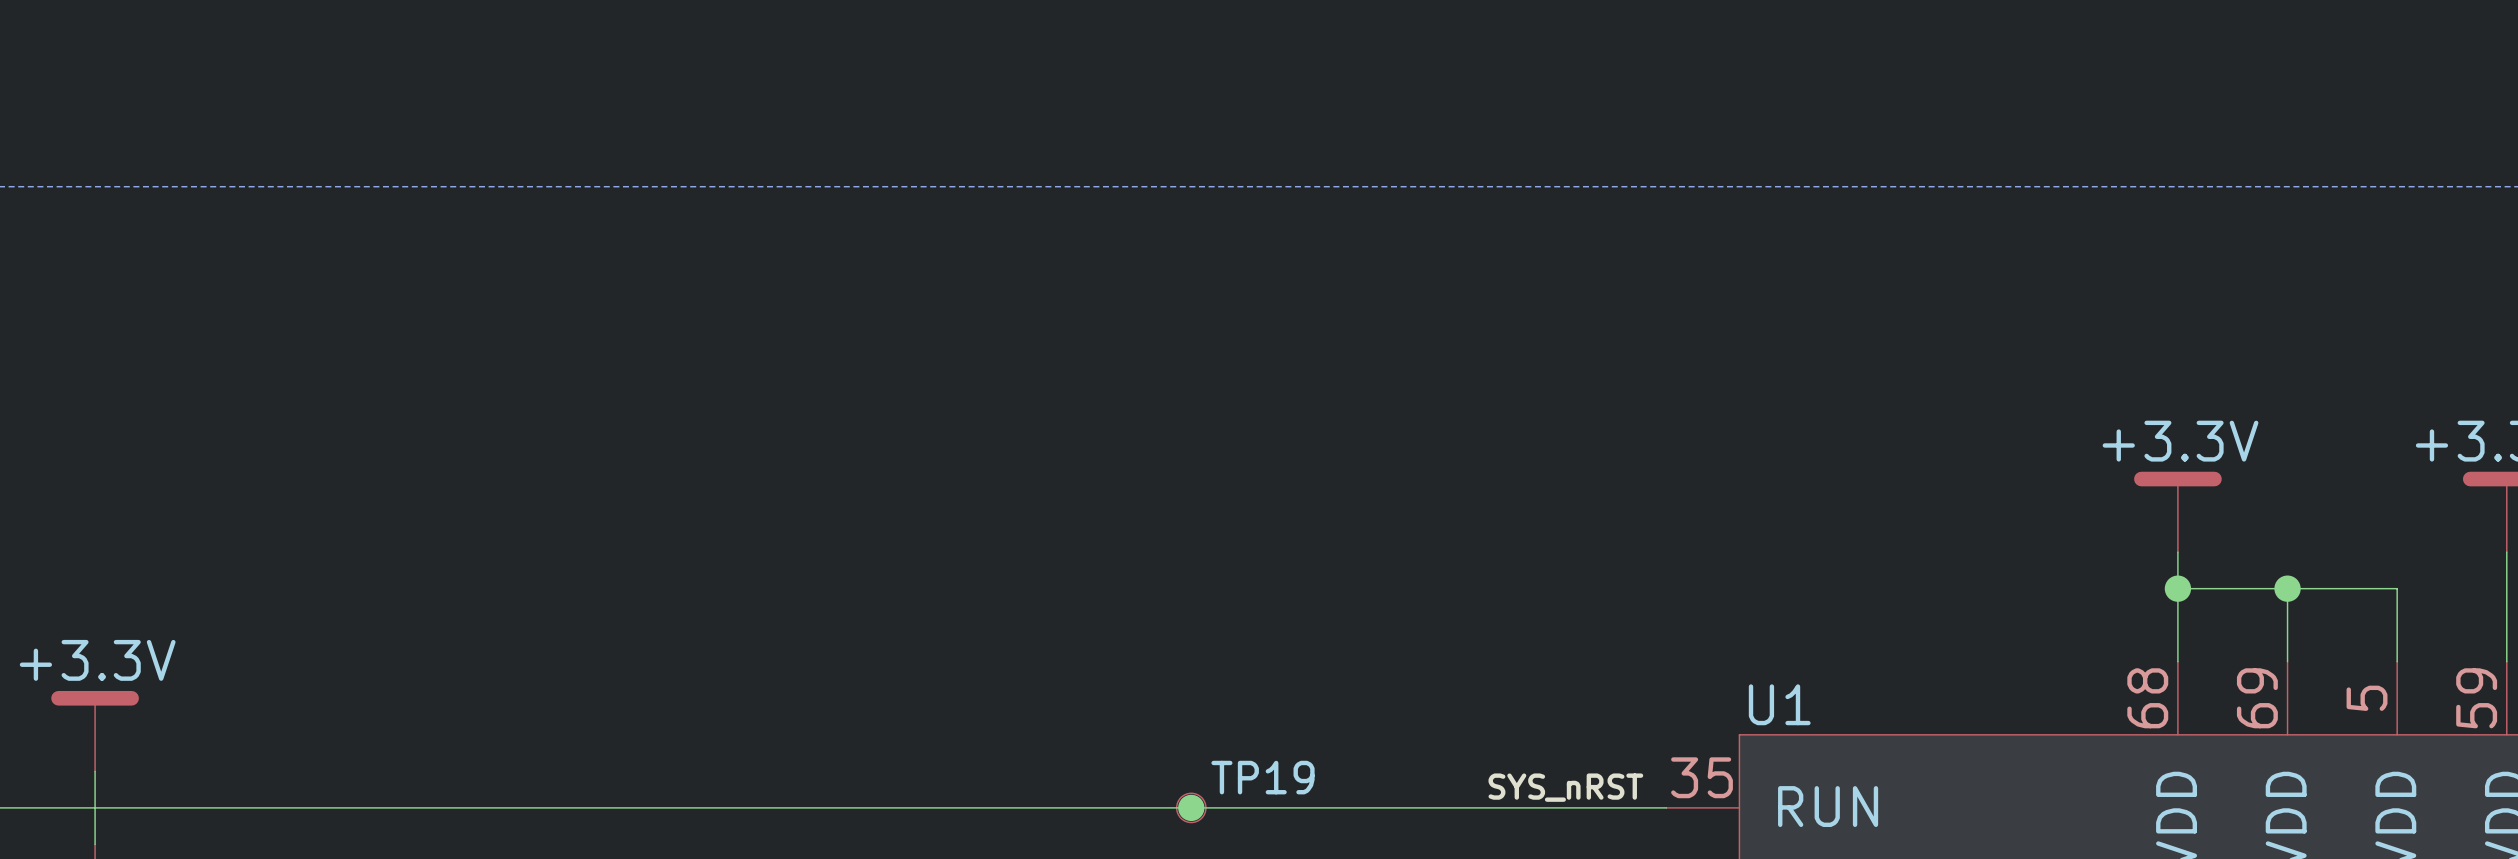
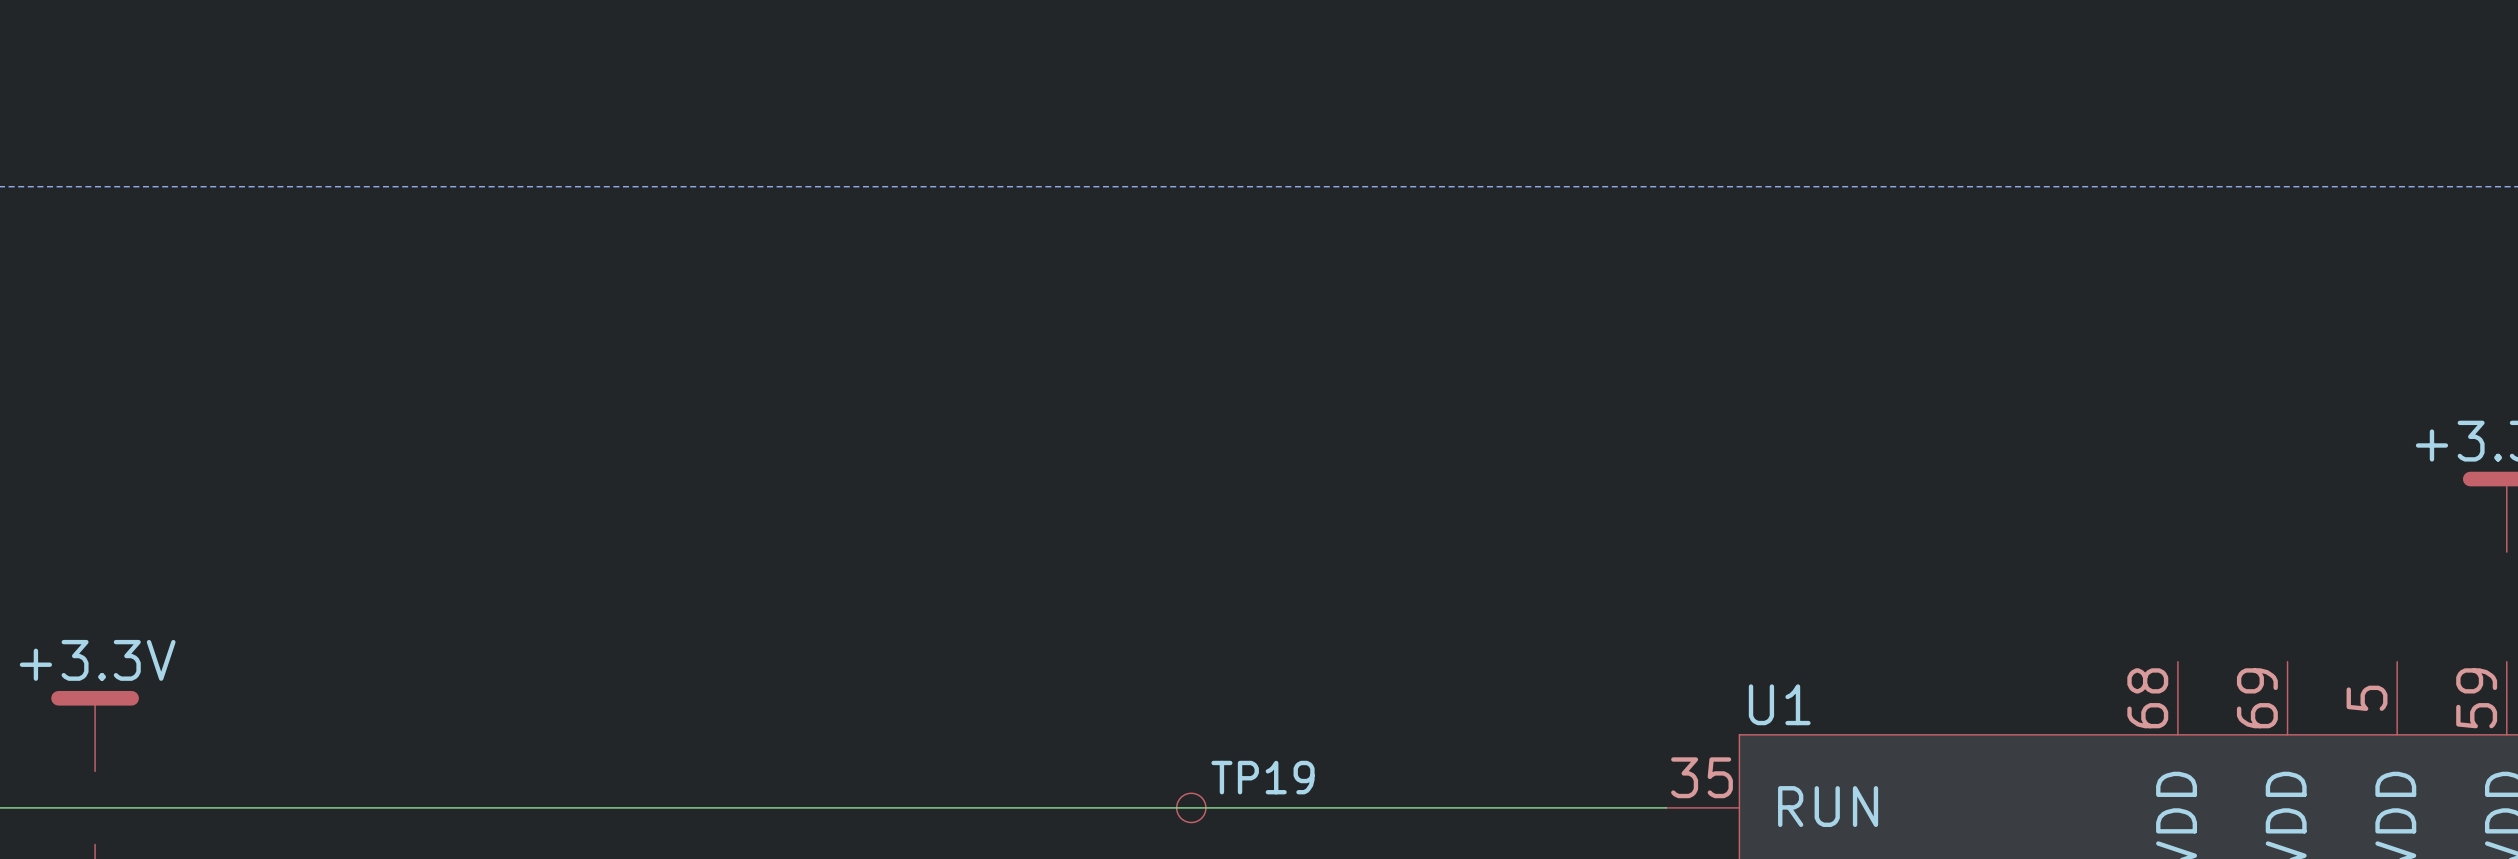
power symbol: +3.3V (2177, 511) -> none
wire: (2177, 552) (2177, 661) -> none
wire: (2506, 552) (2506, 661) -> none
wire: (2177, 588) (2397, 588) (2397, 661) -> none
junction: (2177, 588) -> none
wire: (2287, 588) (2287, 661) -> none
junction: (2287, 588) -> none
wire: (95, 771) (95, 844) -> none
label: SYS_nRST (1565, 787) -> none
junction: (1191, 807) -> none

